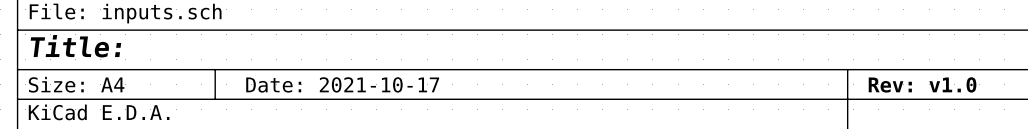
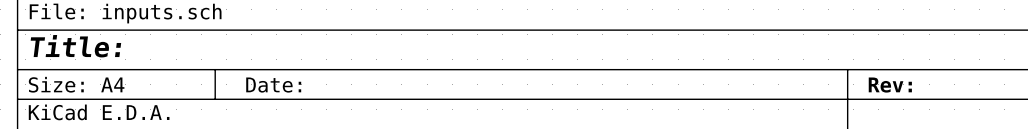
title block: Date: 2021-10-17 (342, 84) -> Date: (273, 85)
title block: Rev: v1.0 (922, 84) -> Rev: (890, 85)

